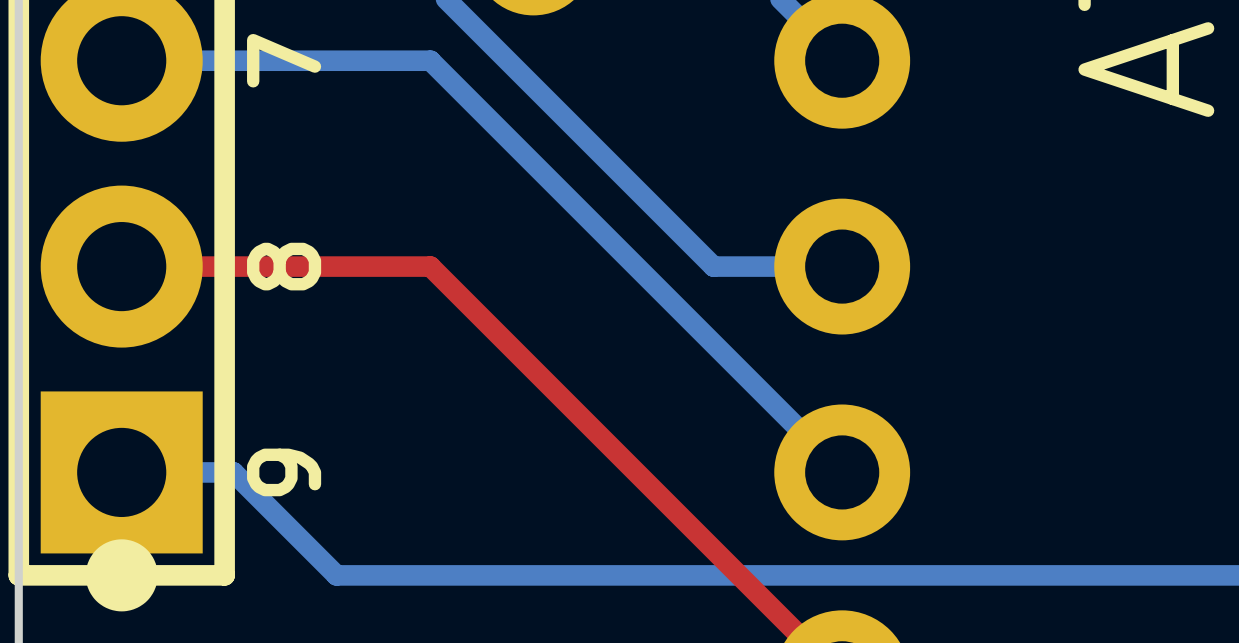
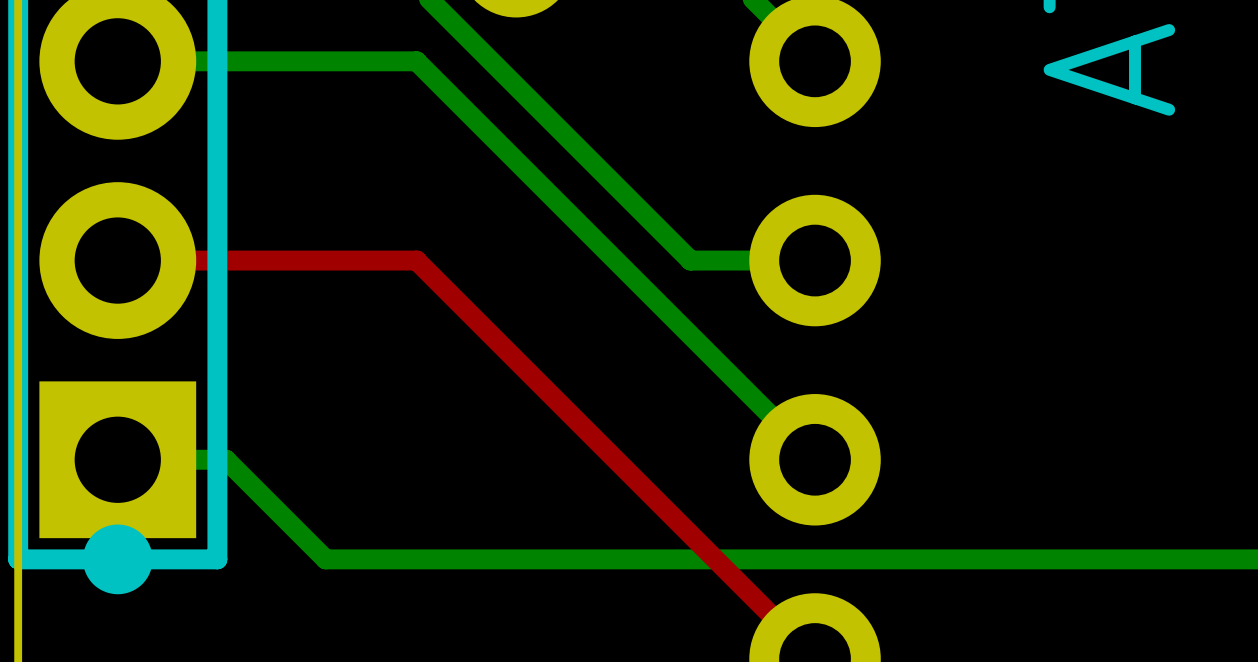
text: 7 (284, 60) -> none
text: 8 (284, 266) -> none
text: 9 (284, 472) -> none

